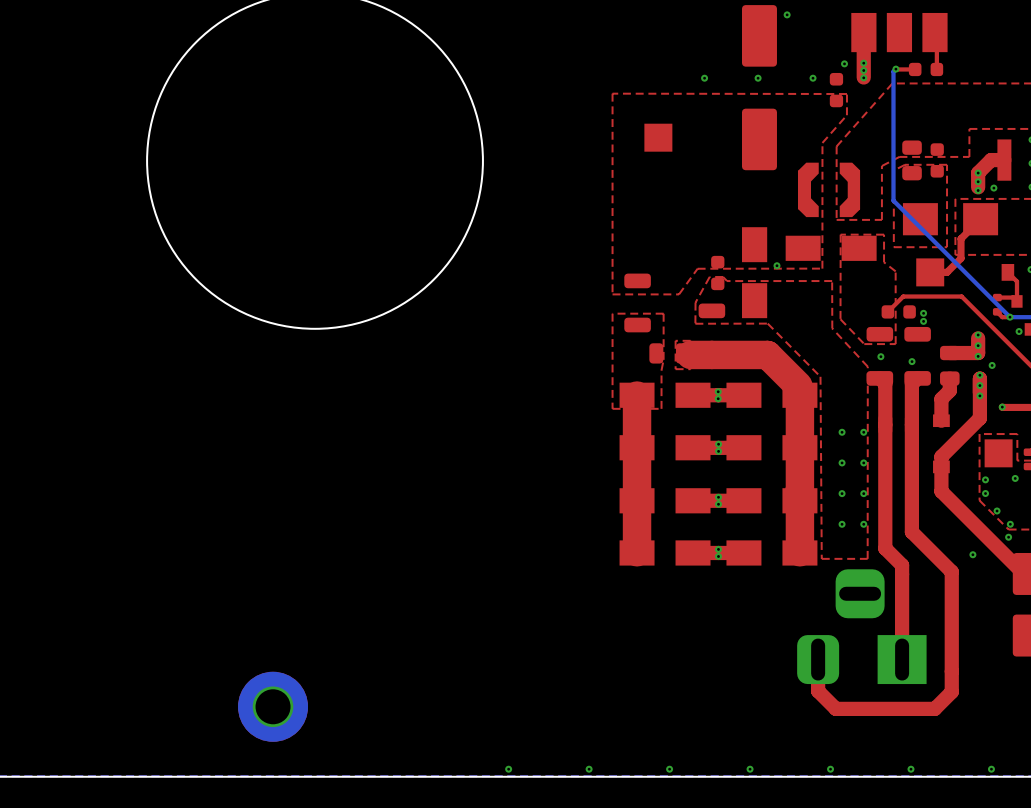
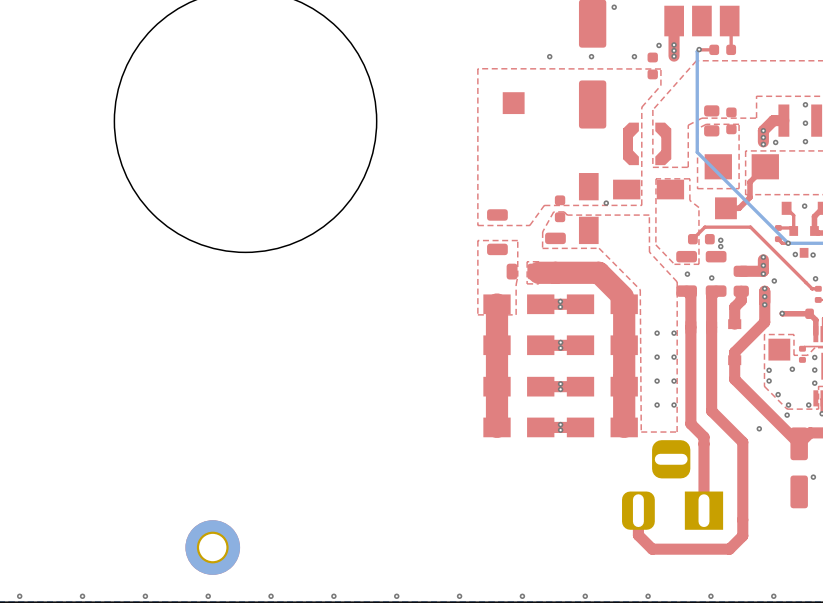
via: none -> (19, 596)
via: none -> (82, 596)
via: none -> (145, 596)
via: none -> (208, 596)
via: none -> (271, 596)
via: none -> (333, 596)

